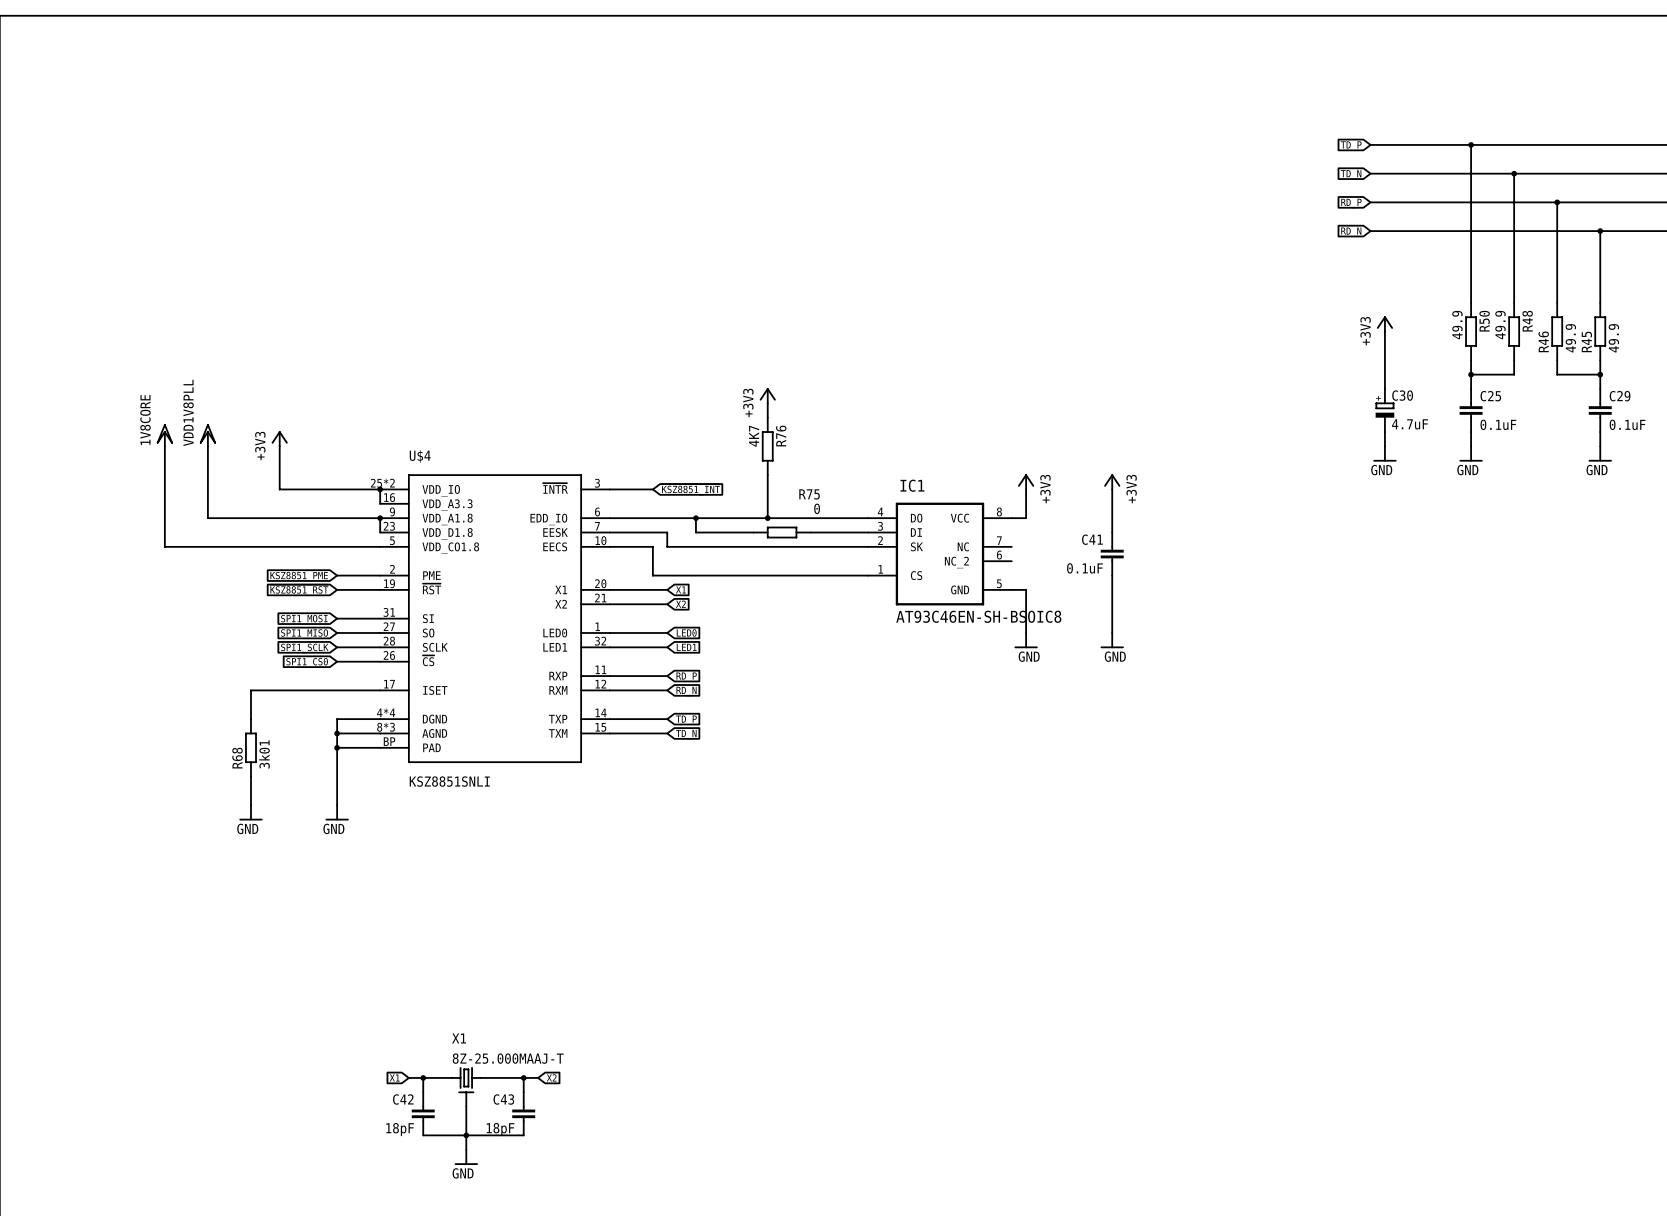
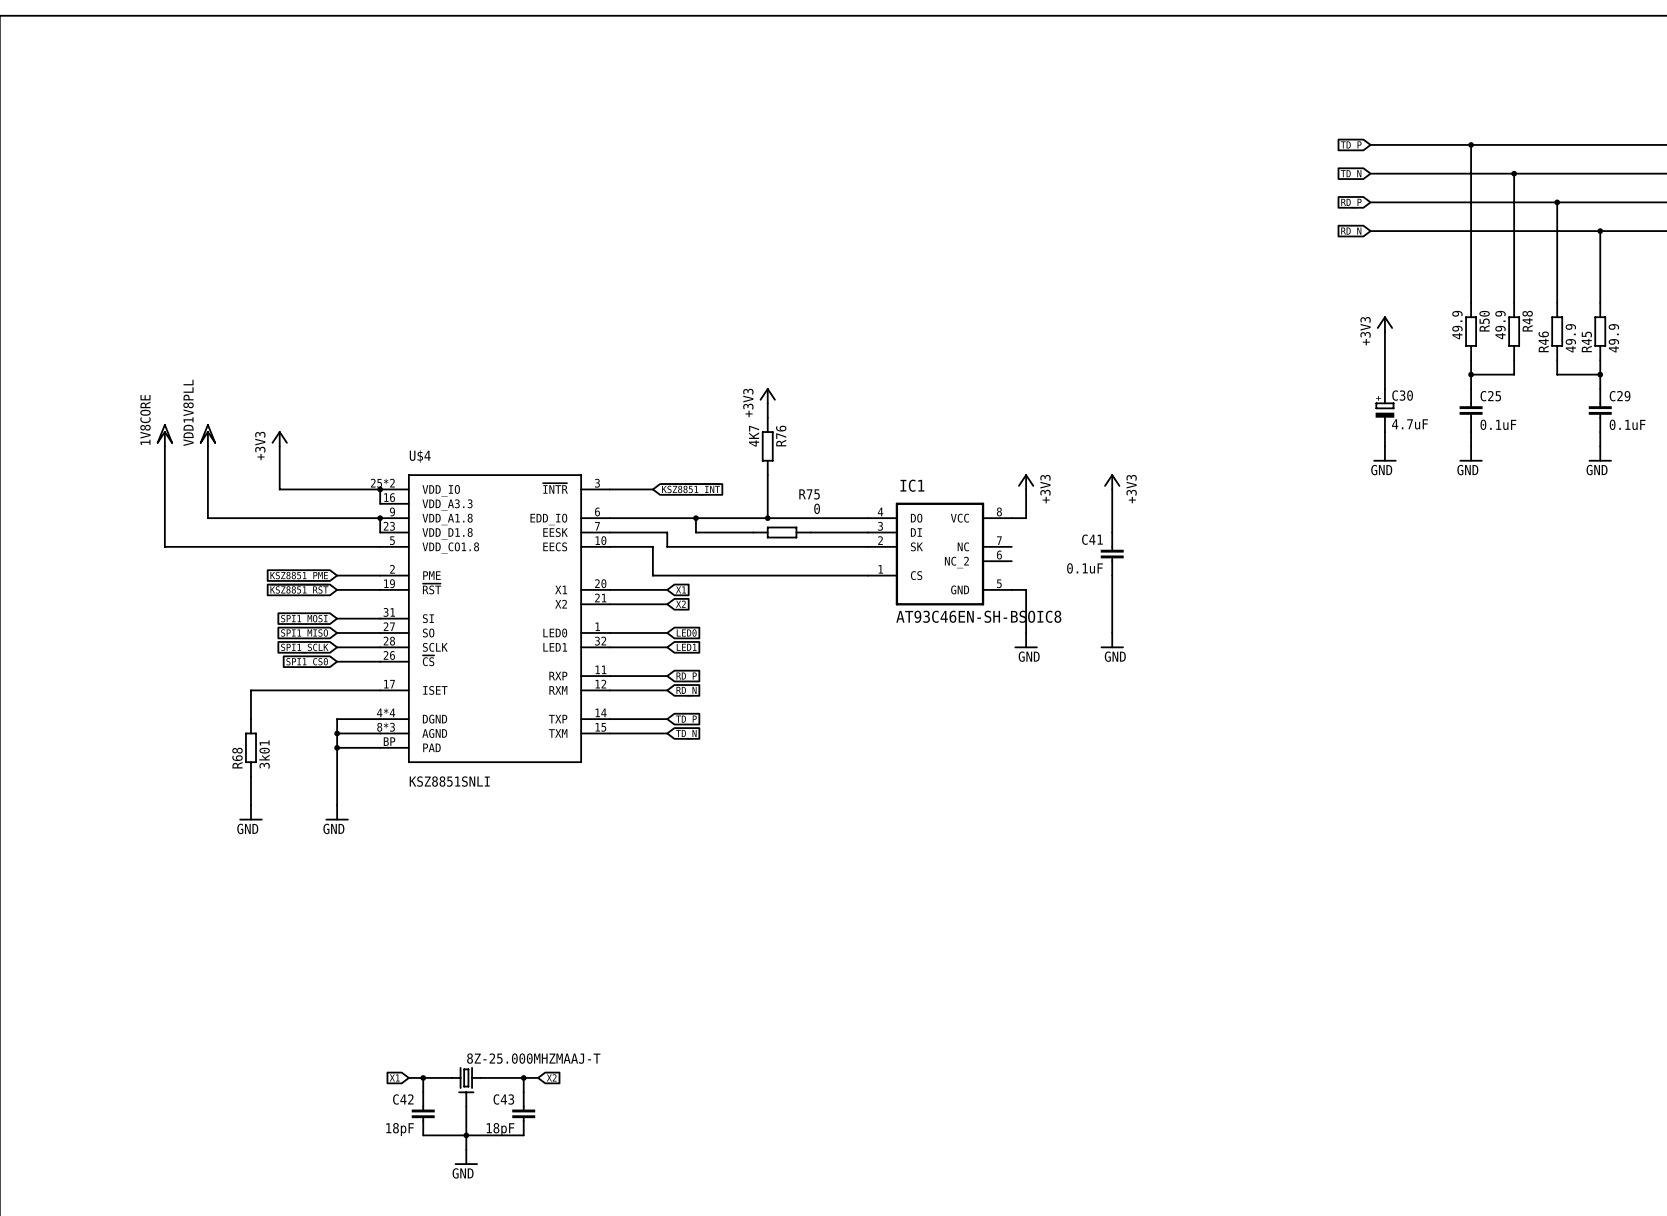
X1 name: X1 (459, 1038) -> none
X1 value: 8Z-25.000MAAJ-T (508, 1058) -> 8Z-25.000MHZMAAJ-T (533, 1058)

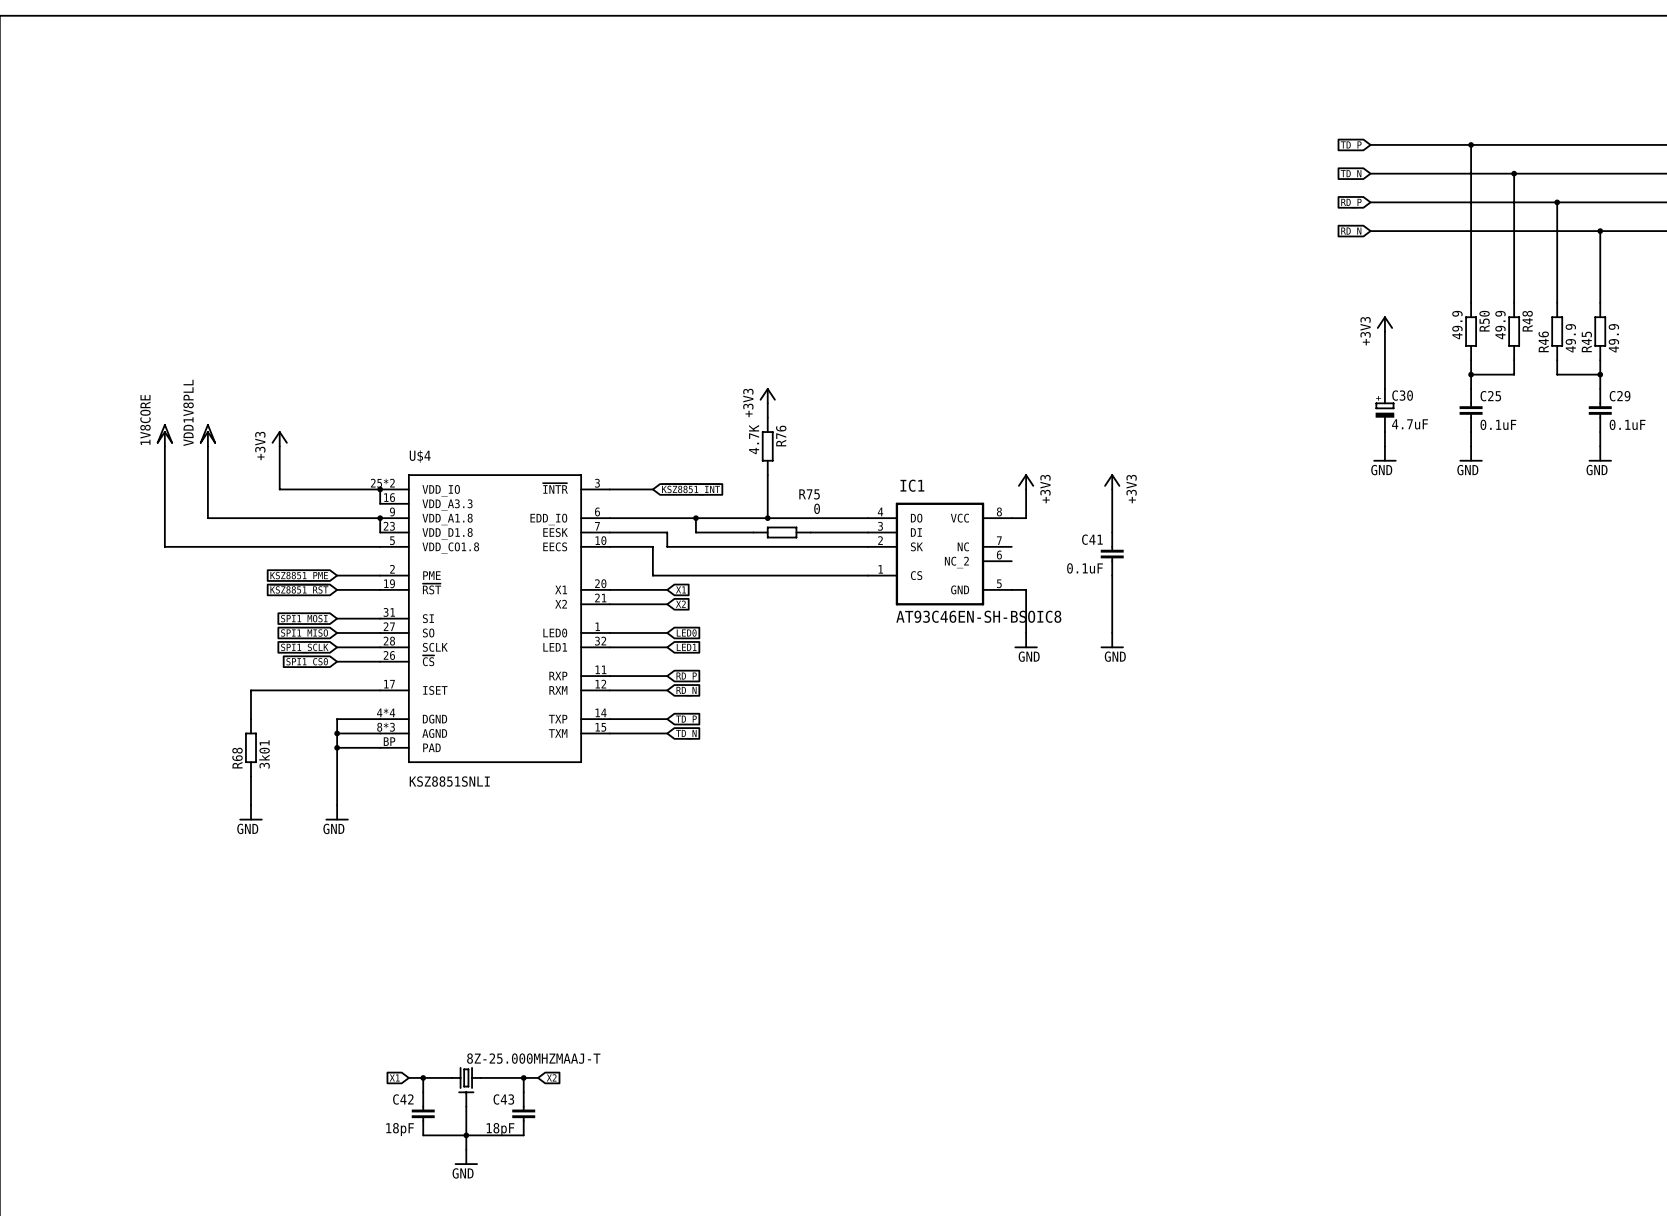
R76 value: 4K7 (754, 436) -> 4.7K (754, 439)

